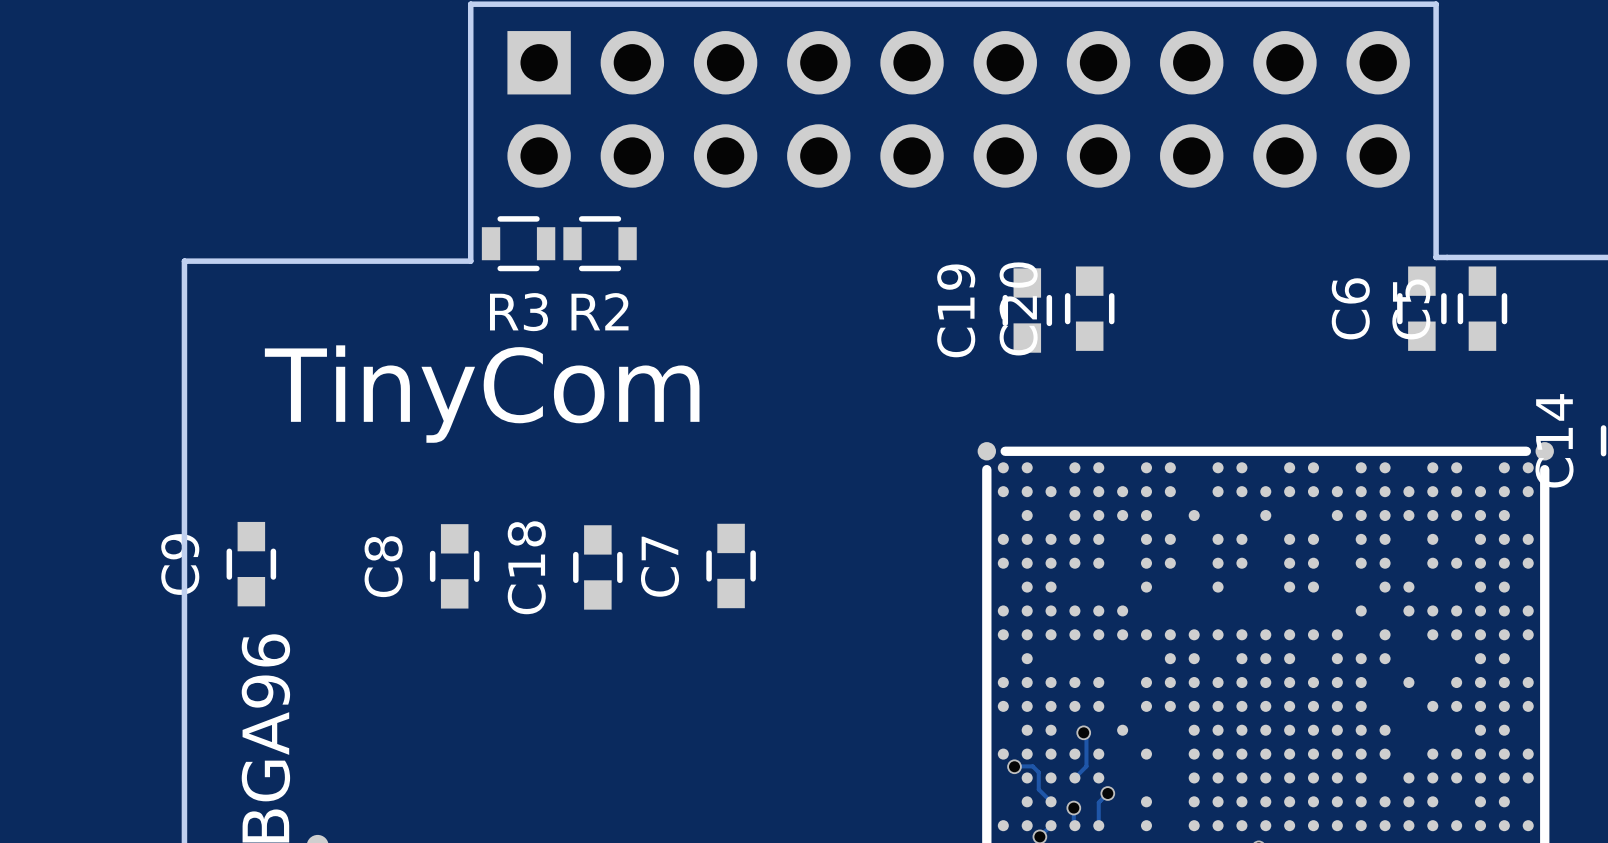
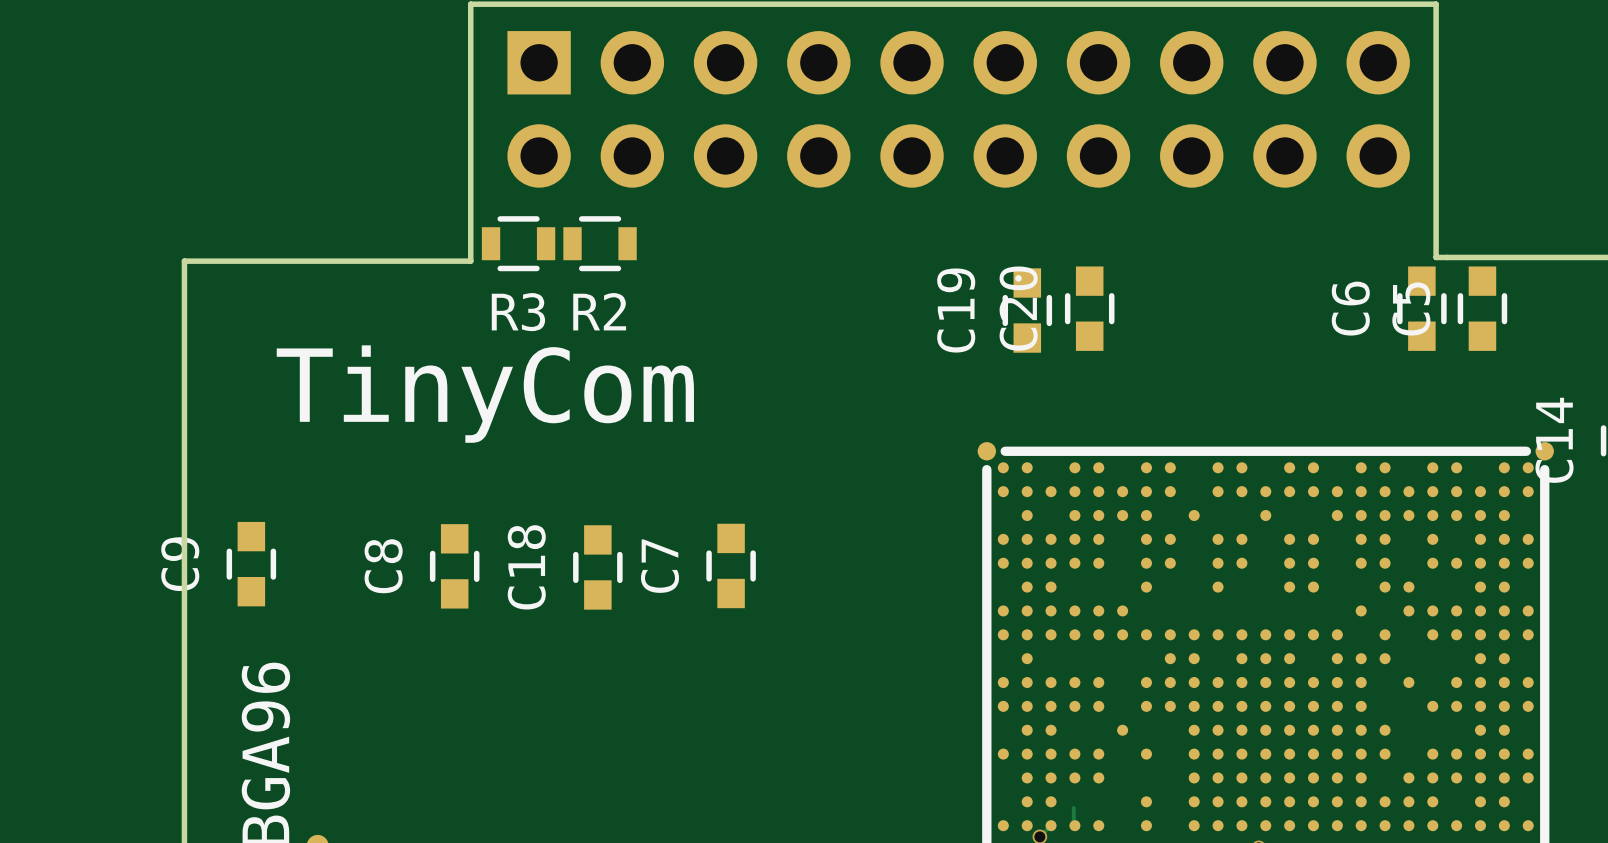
track: (1083, 732) (1086, 735) (1086, 766) (1074, 777) -> none
via: (1083, 732) -> none
track: (1014, 766) (1032, 766) (1038, 772) (1038, 789) (1051, 801) -> none
via: (1014, 766) -> none
track: (1107, 793) (1098, 802) (1098, 825) -> none
via: (1107, 793) -> none
via: (1073, 808) -> none

